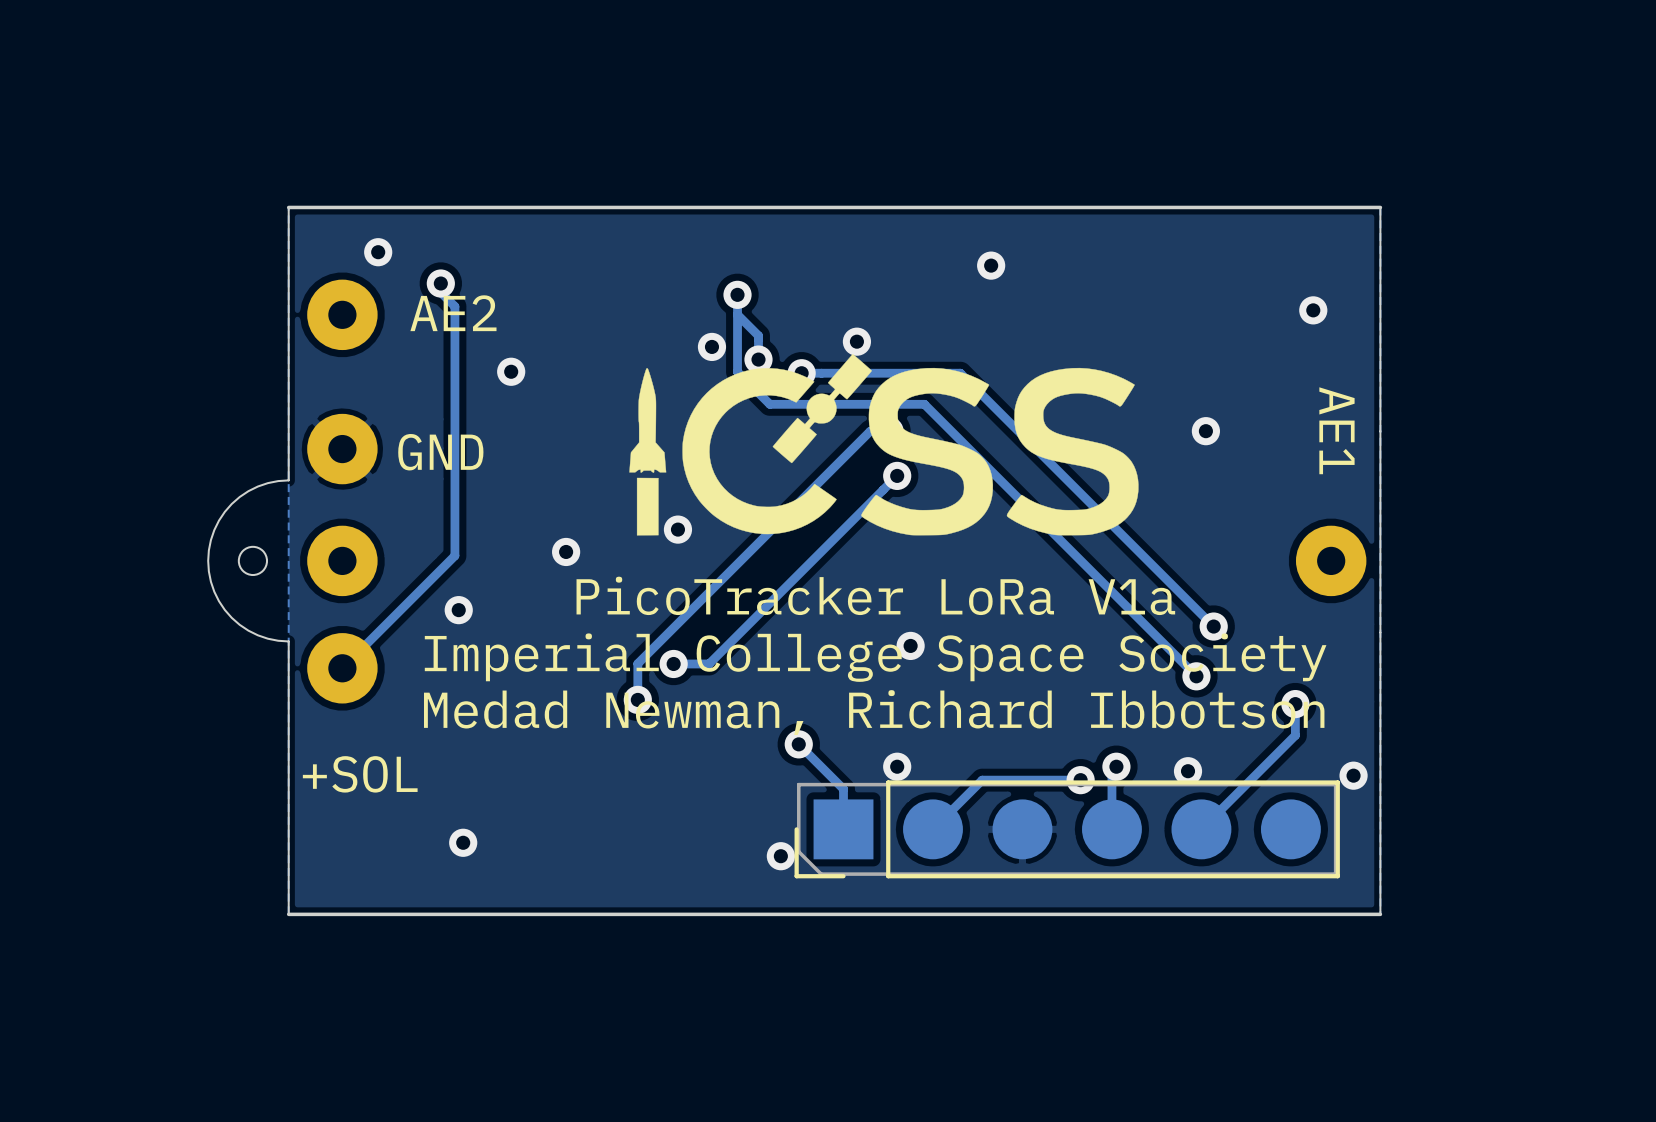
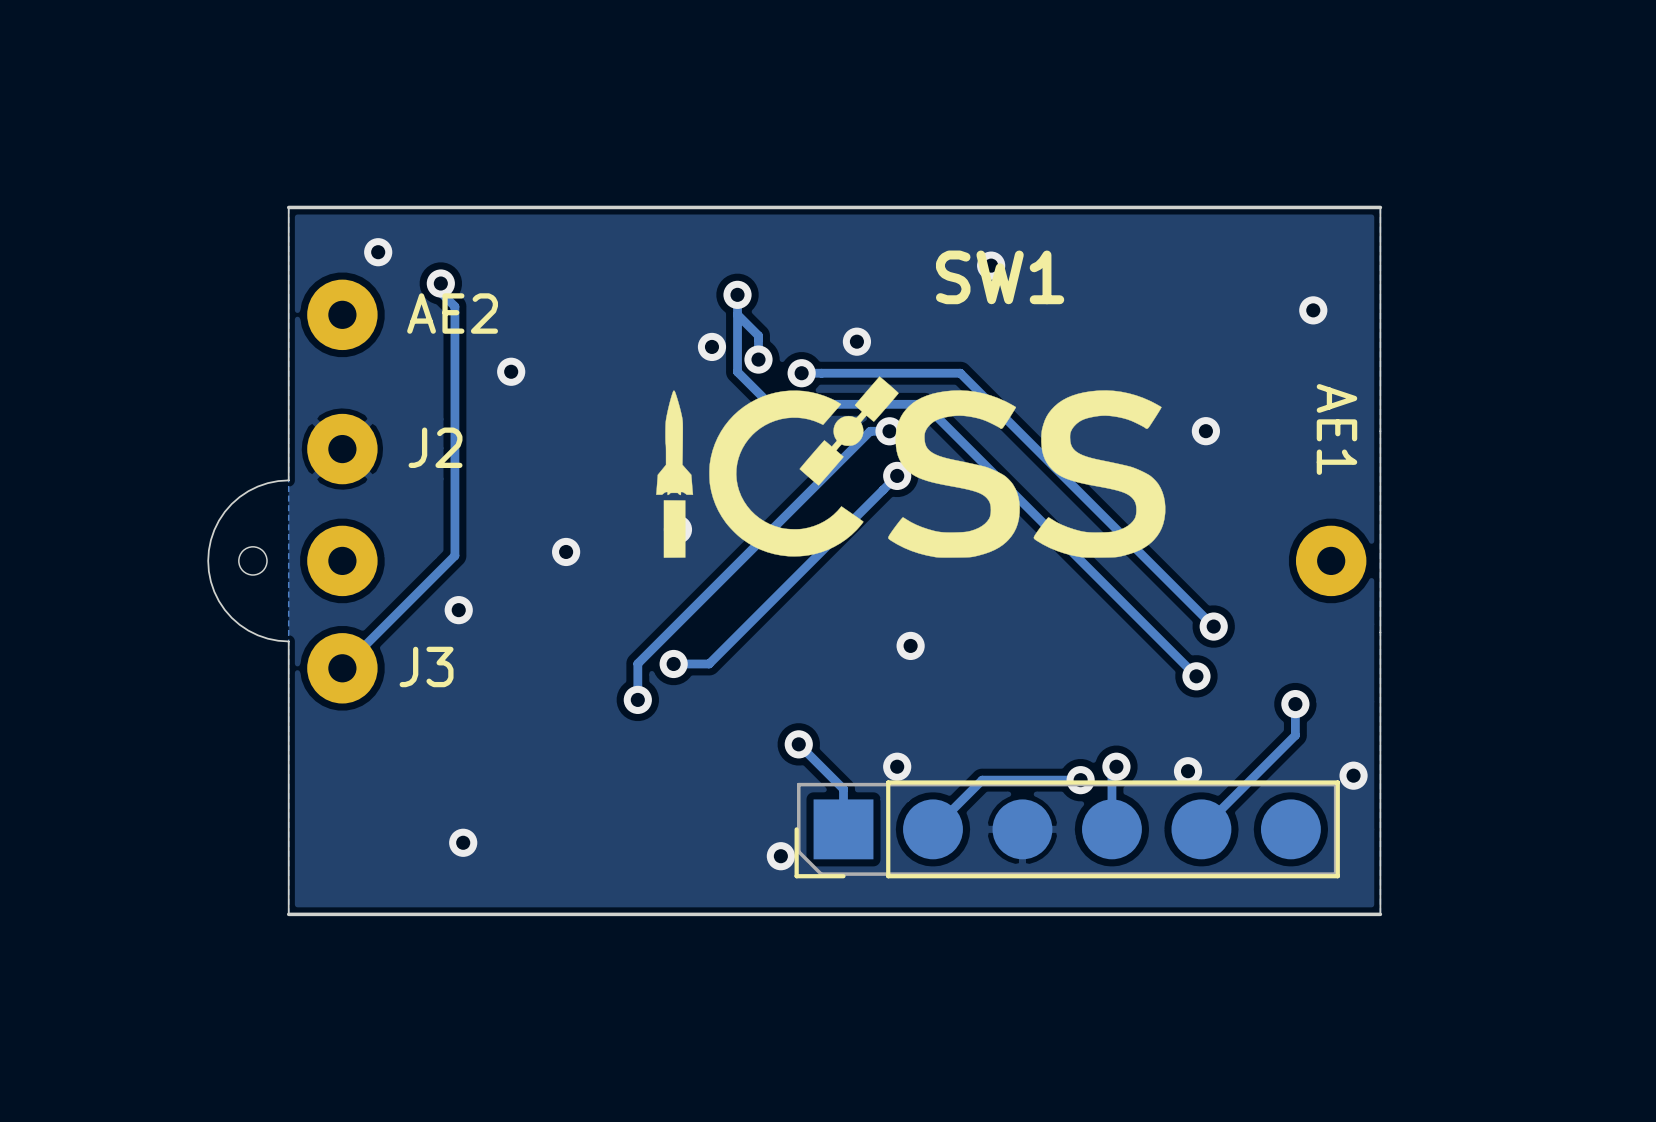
SW1: none -> (1000, 277)
drawing position: (883, 444) -> (910, 467)
GND name: GND (440, 452) -> J2 (435, 447)
text: PicoTracker LoRa V1a (875, 595) -> none
text: Imperial College Space Society (875, 657) -> none
text: Medad Newman, Richard Ibbotson (874, 712) -> none
+SOL name: +SOL (360, 774) -> J3 (426, 666)

